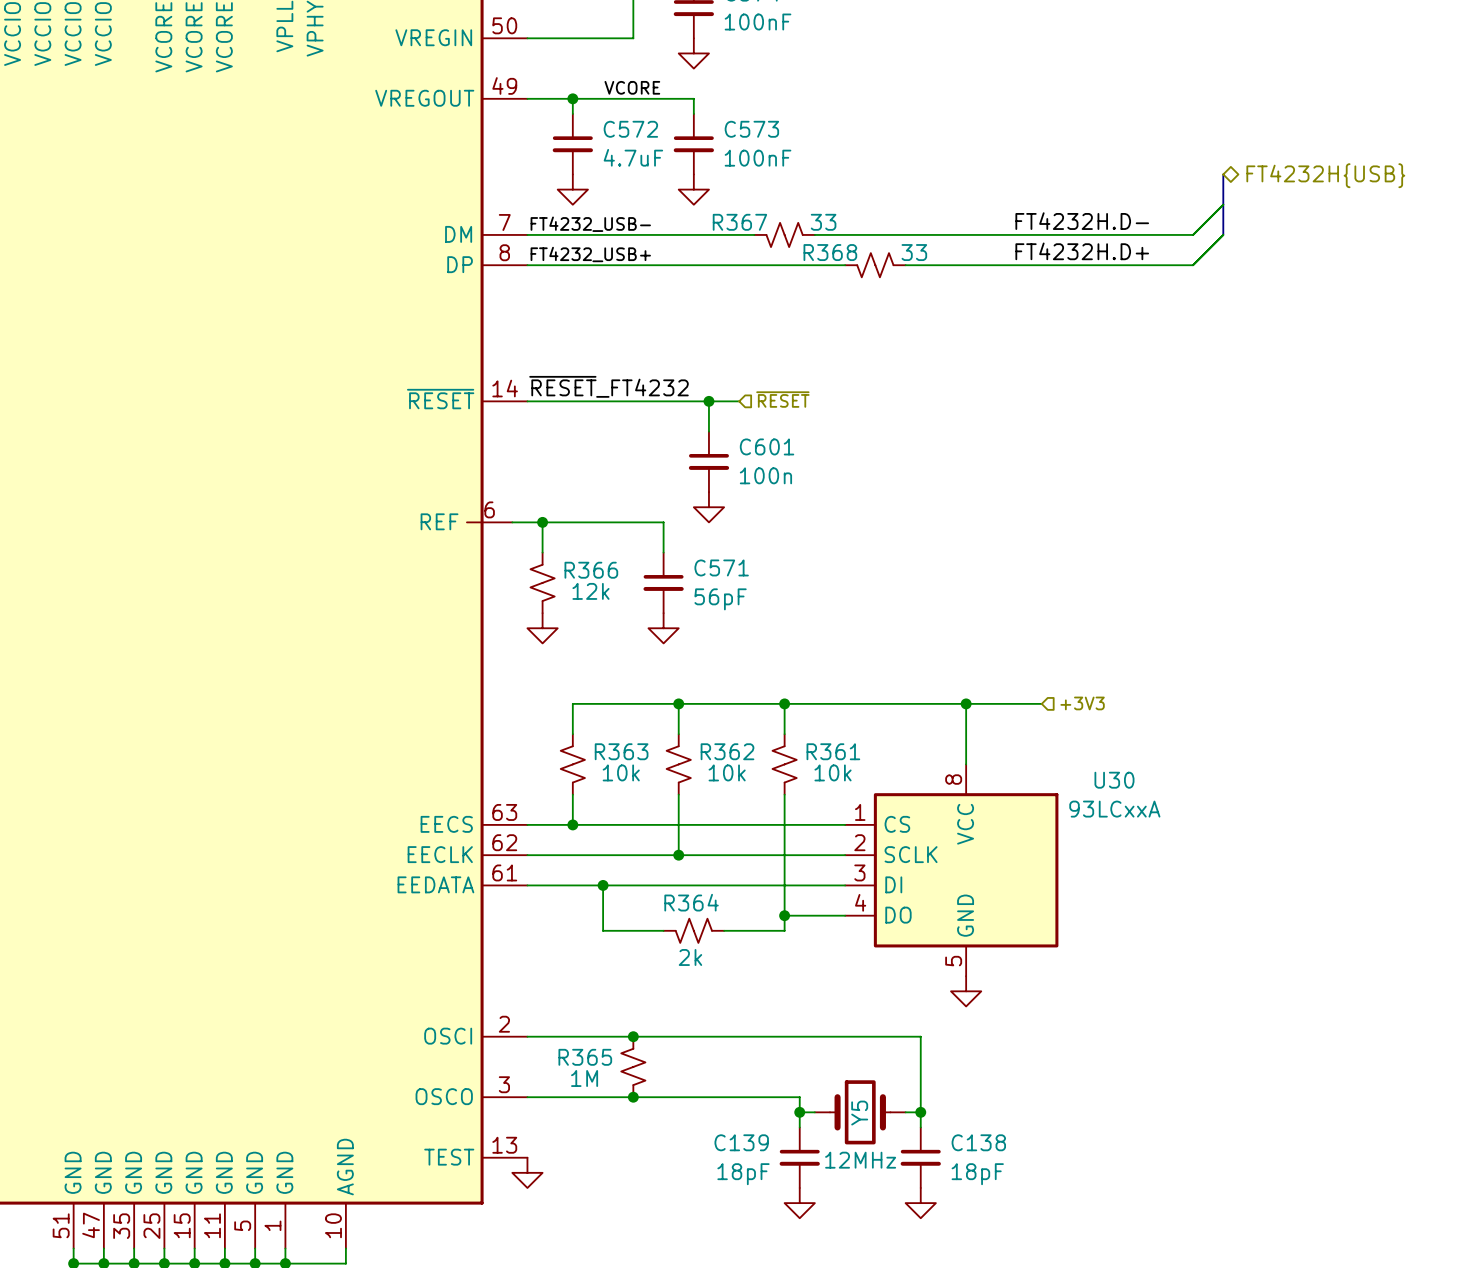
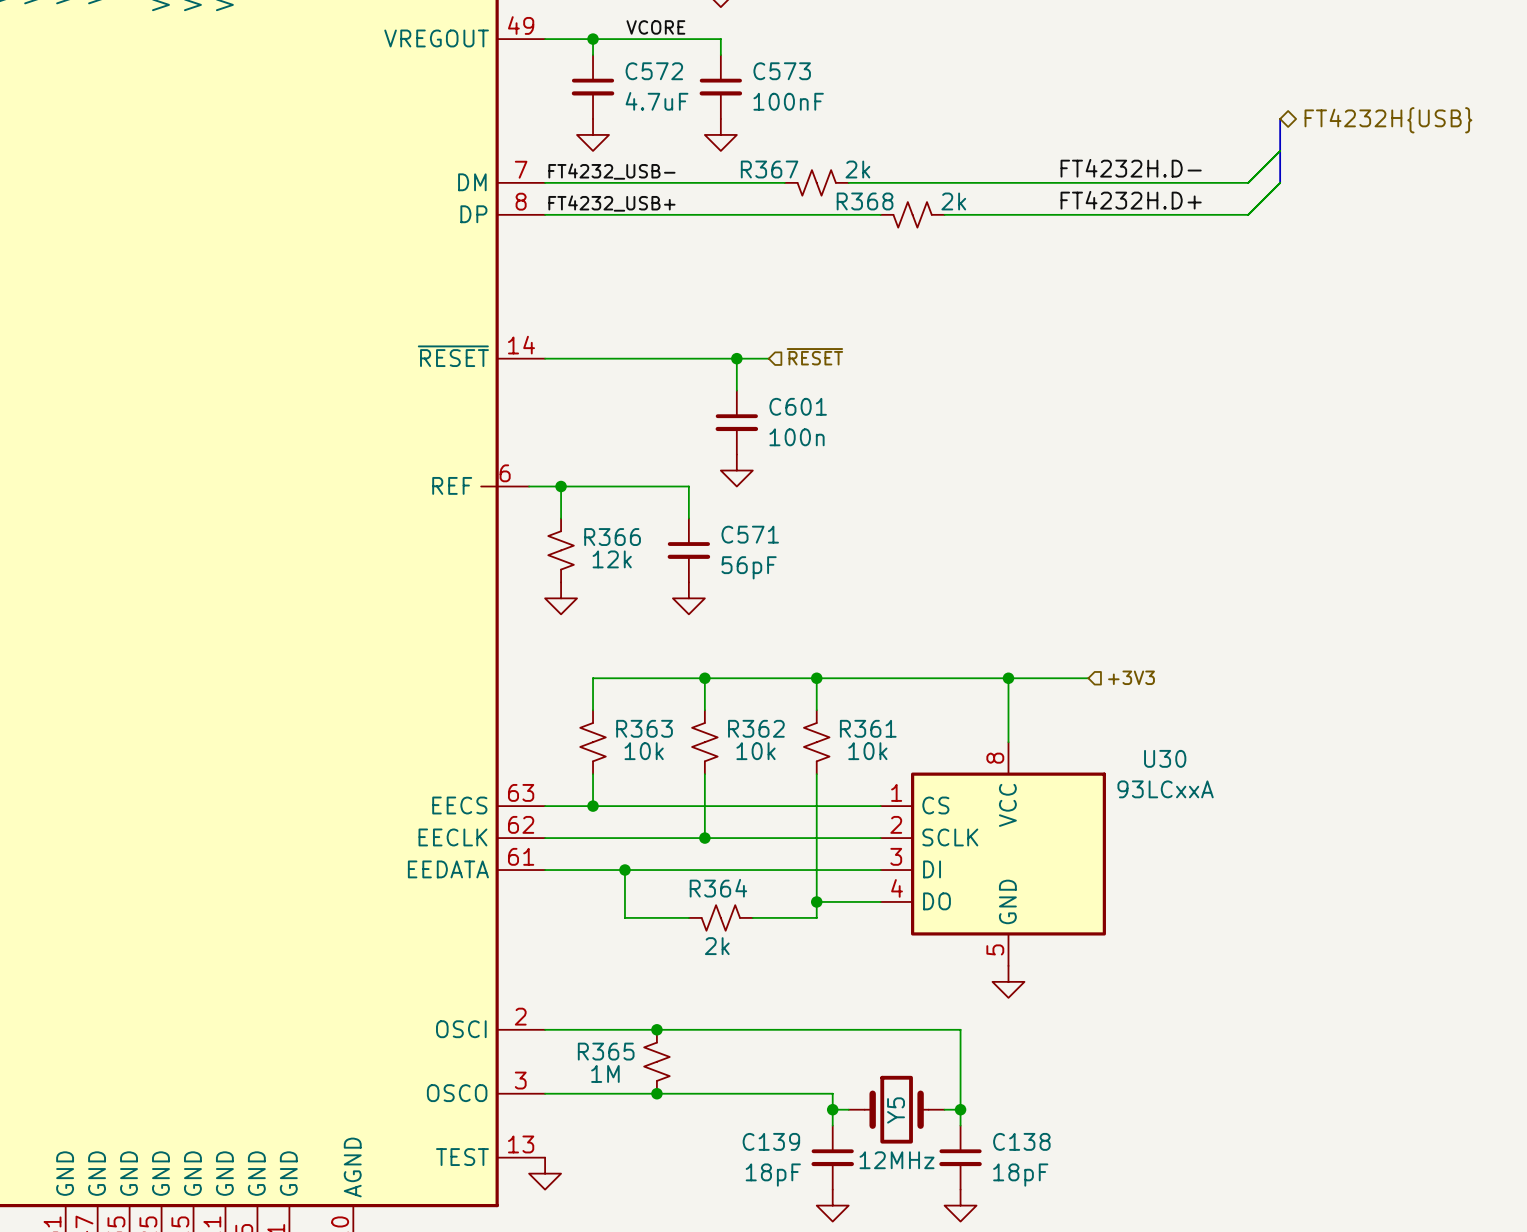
R367 value: 33 (823, 222) -> 2k (857, 169)
R368 value: 33 (914, 252) -> 2k (953, 201)
label: ~{RESET}_FT4232 (609, 386) -> none

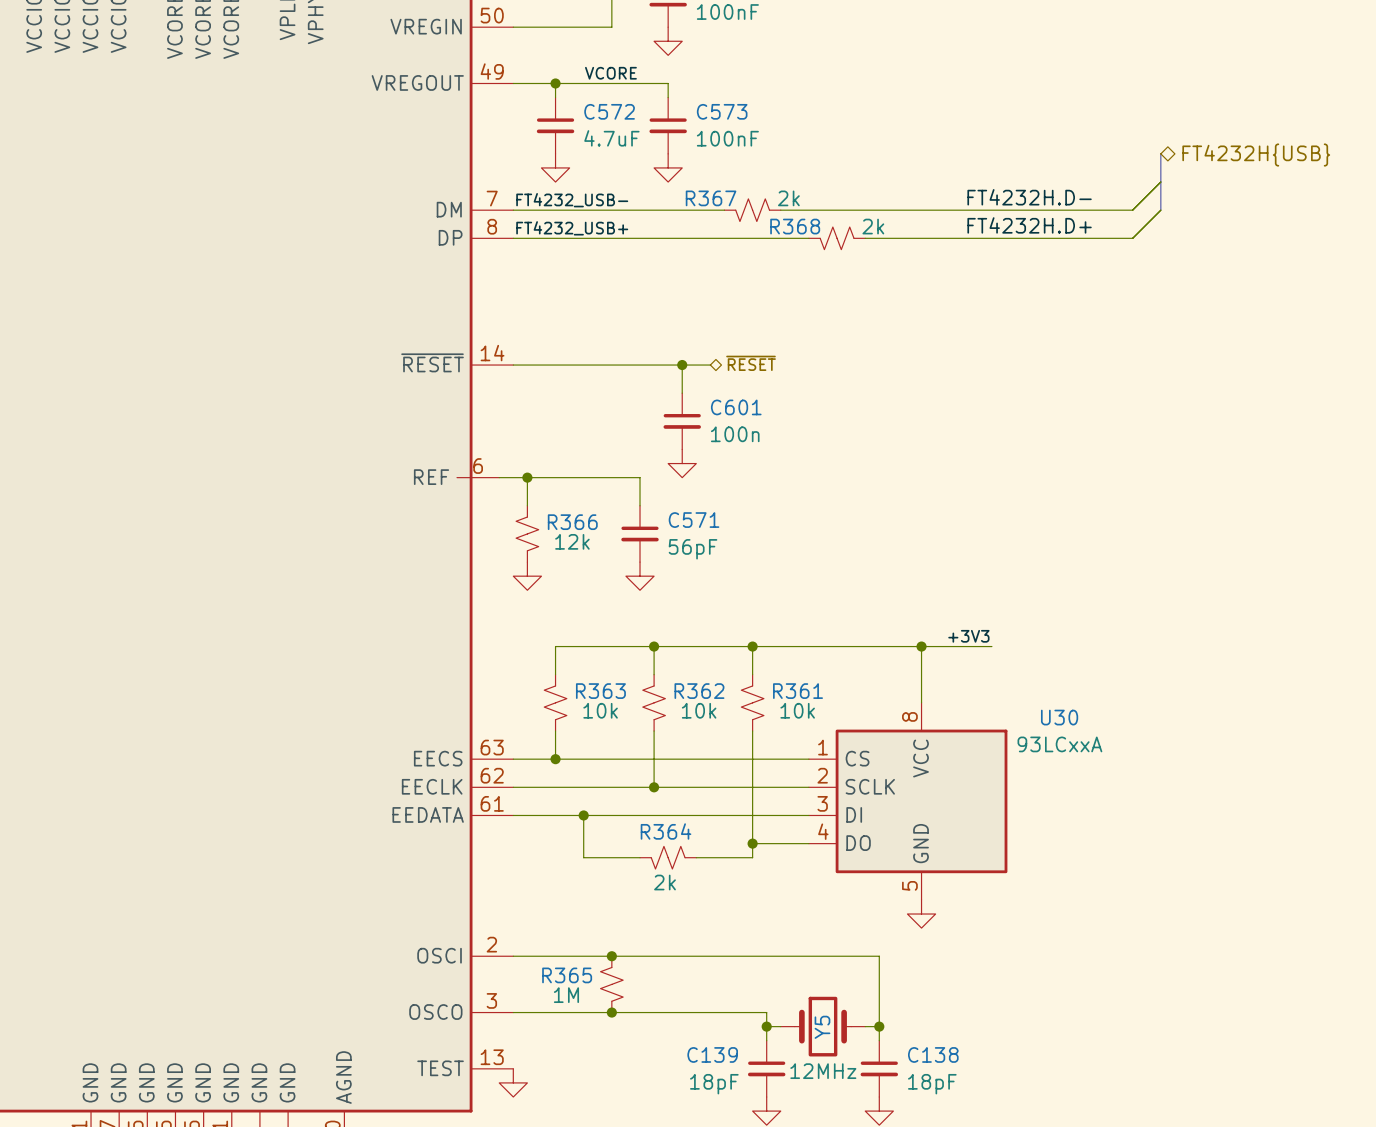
hierarchical label shape: input (814, 356) -> bidirectional (751, 363)
label: none -> +3V3 (968, 636)
hierarchical label: +3V3 (1131, 677) -> none

